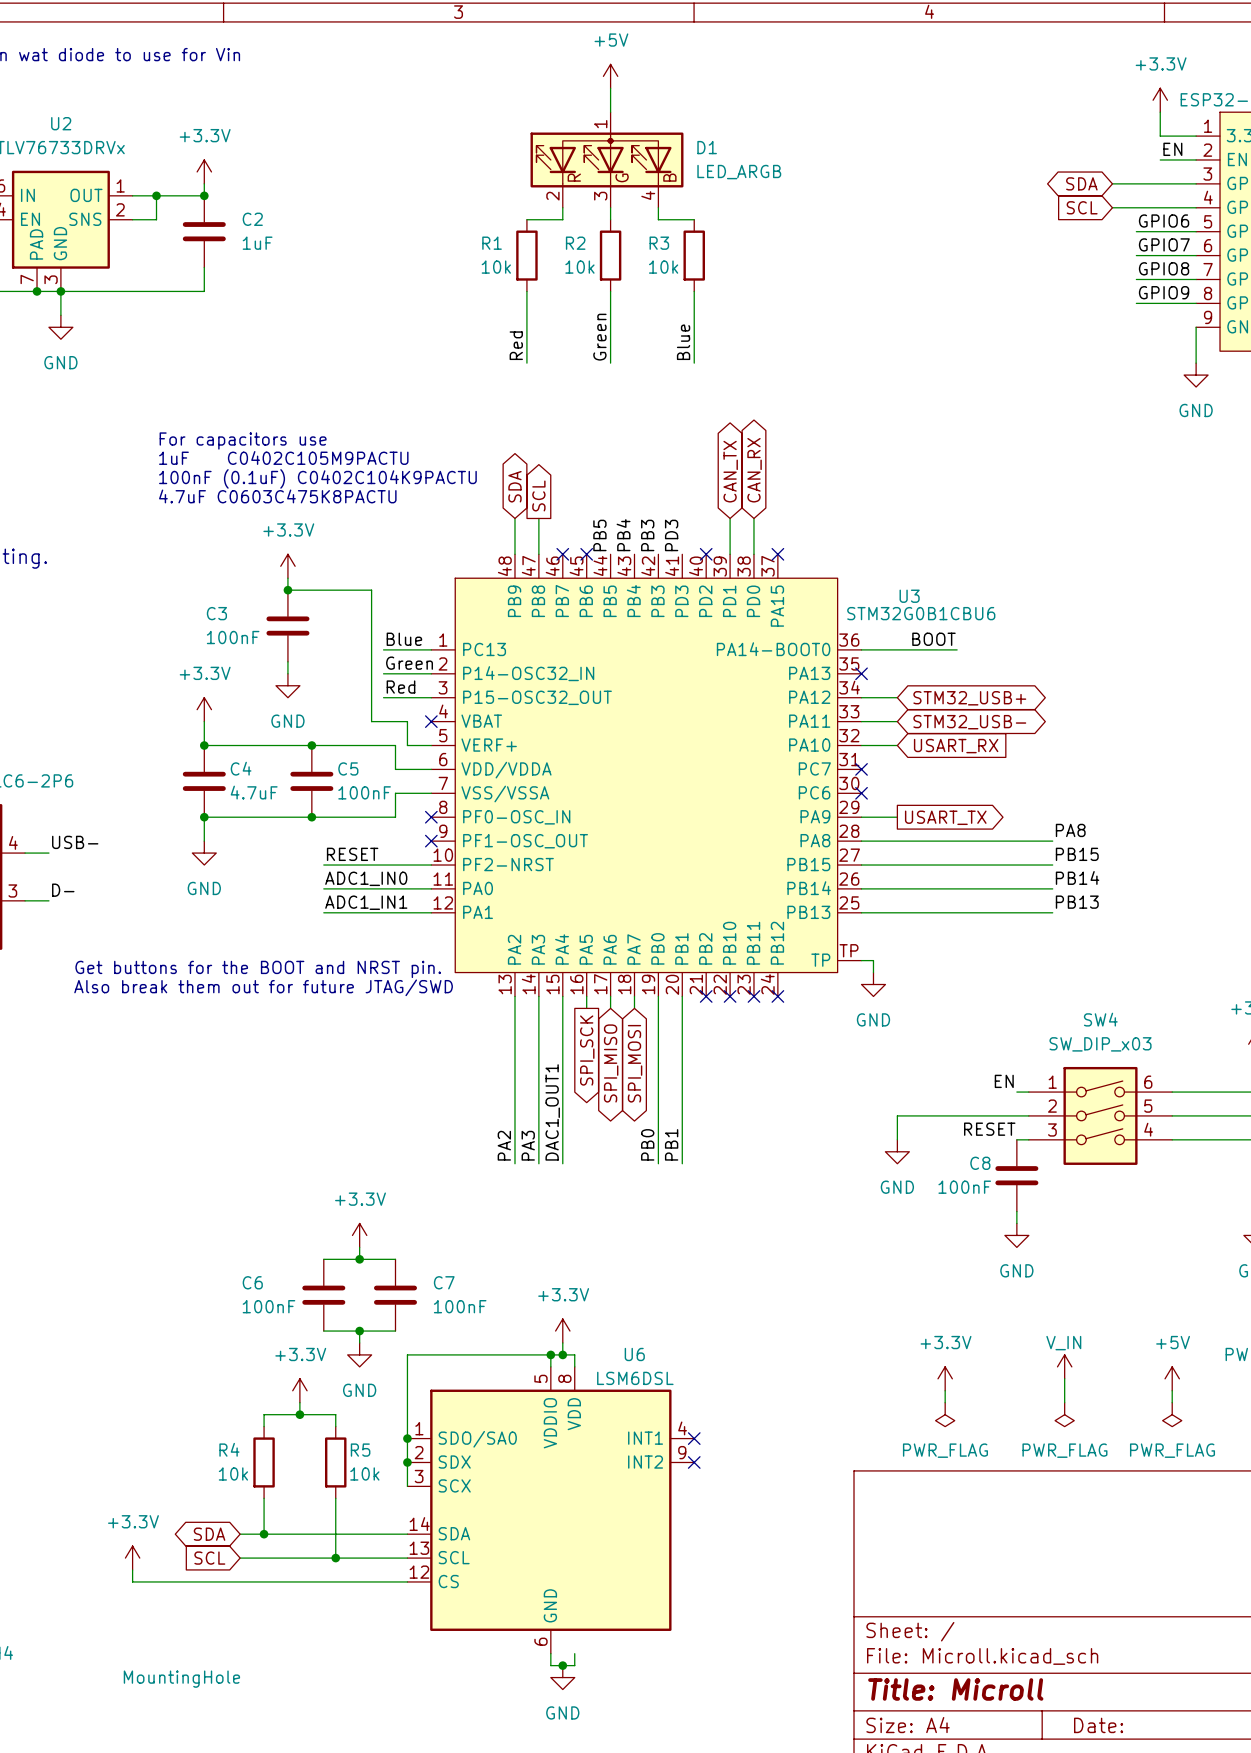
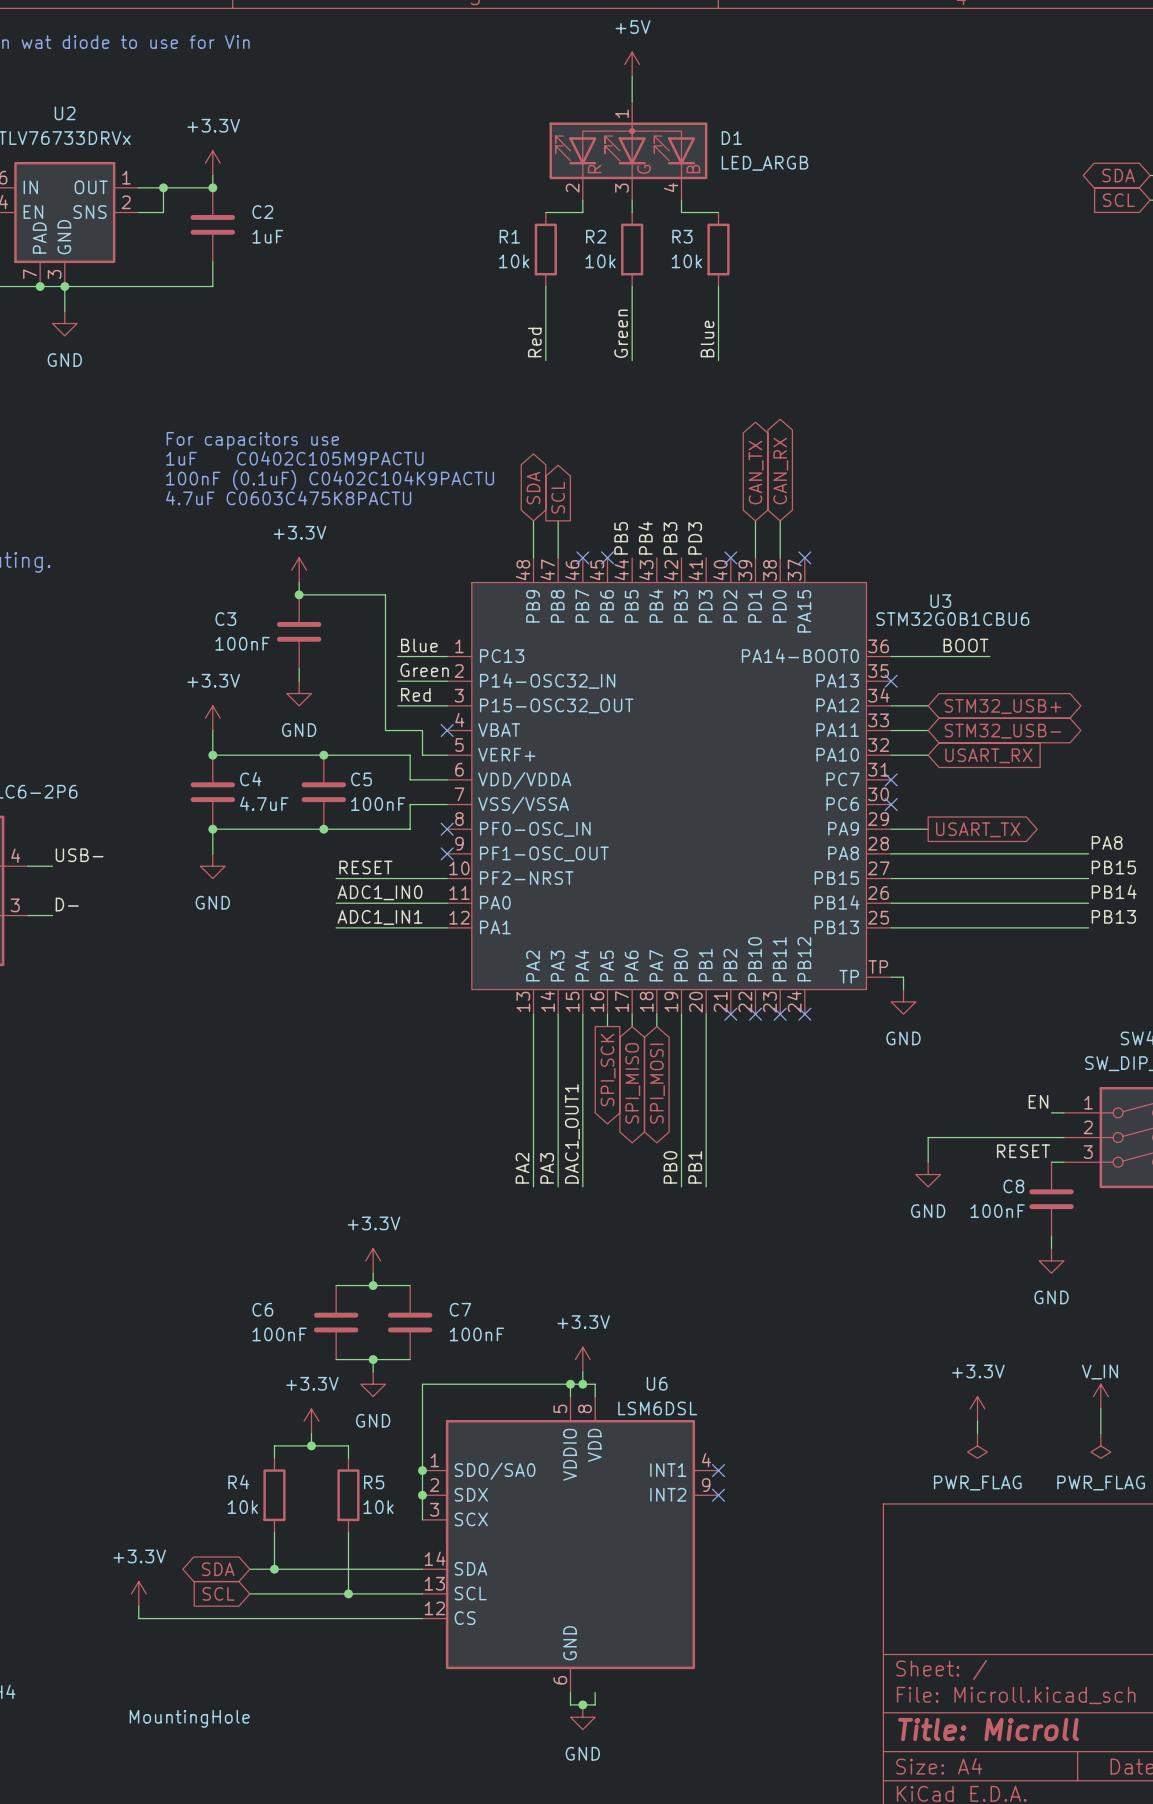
text: Get buttons for the BOOT and NRST pin. (258, 969) -> none
text: Also break them out for future JTAG/SWD (263, 987) -> none

